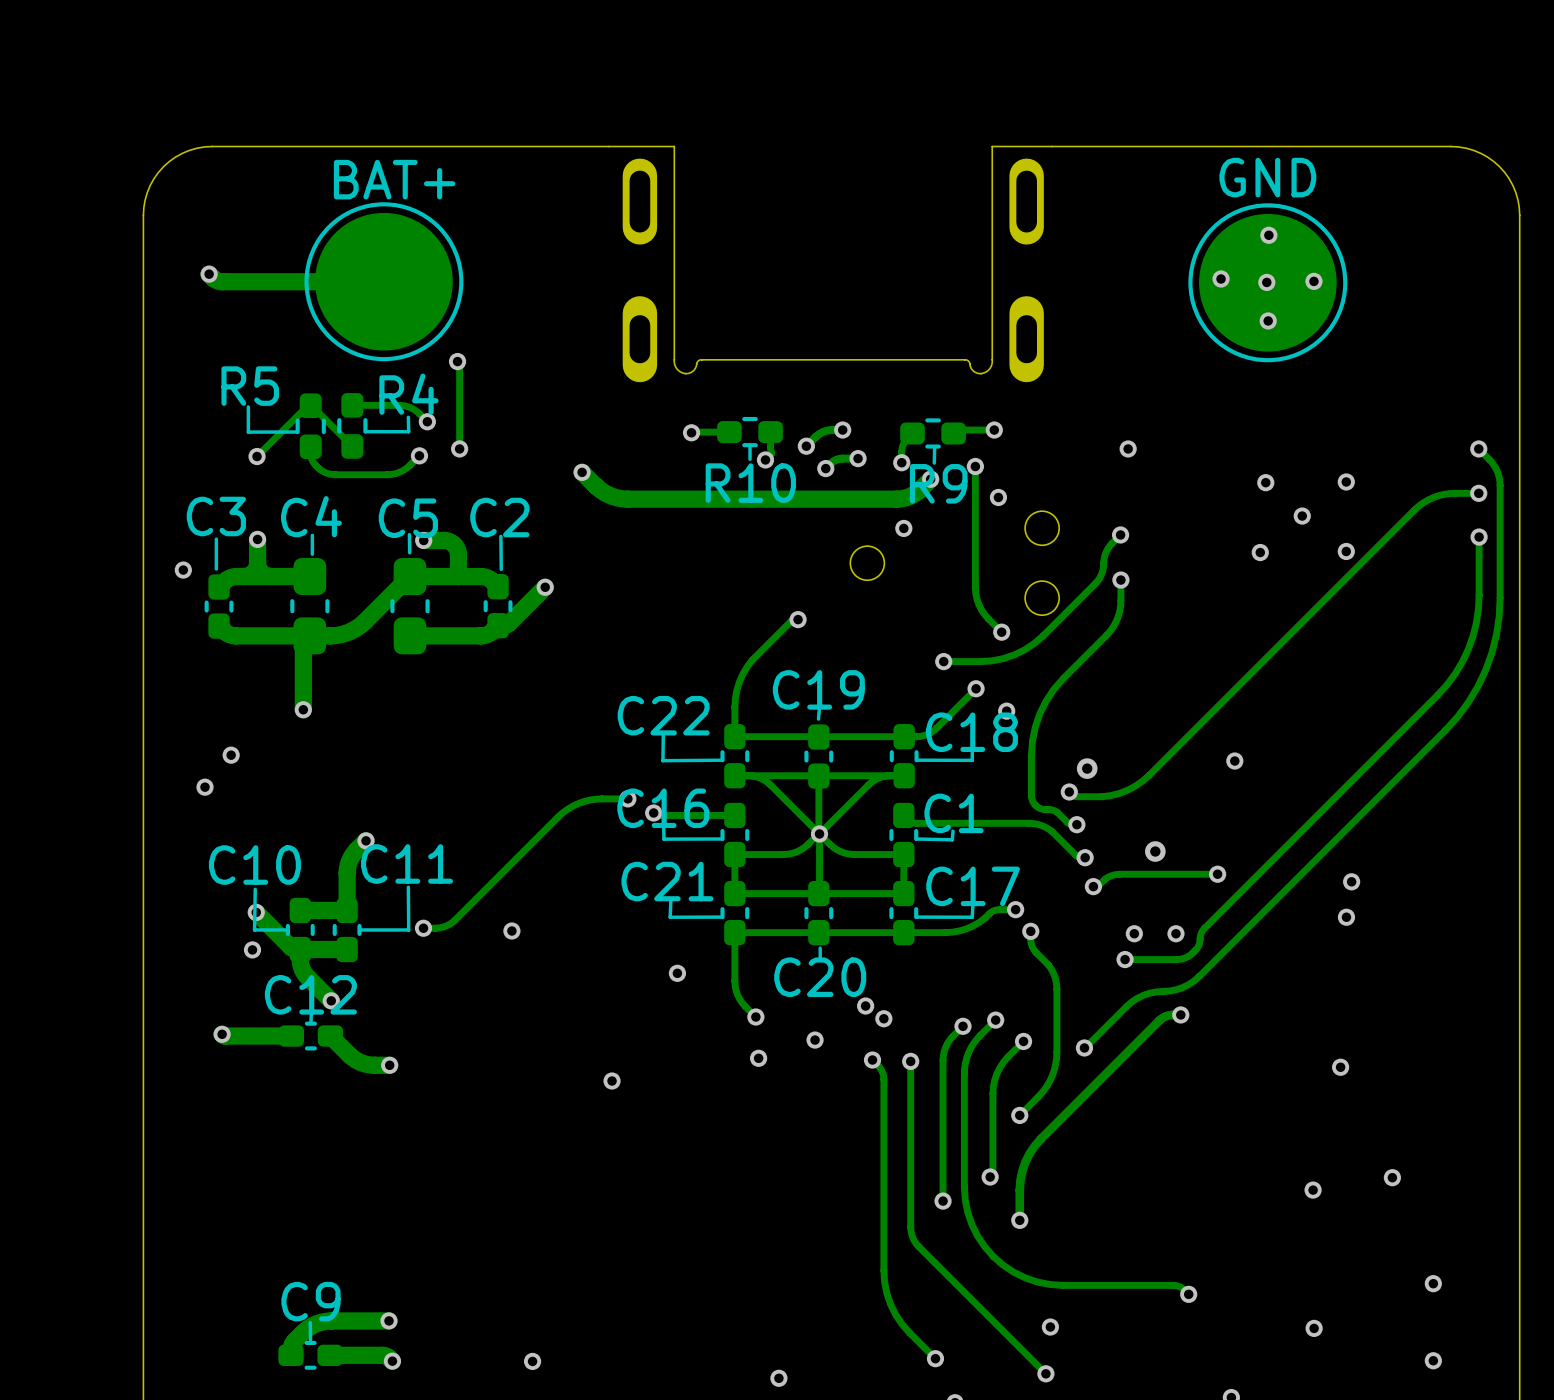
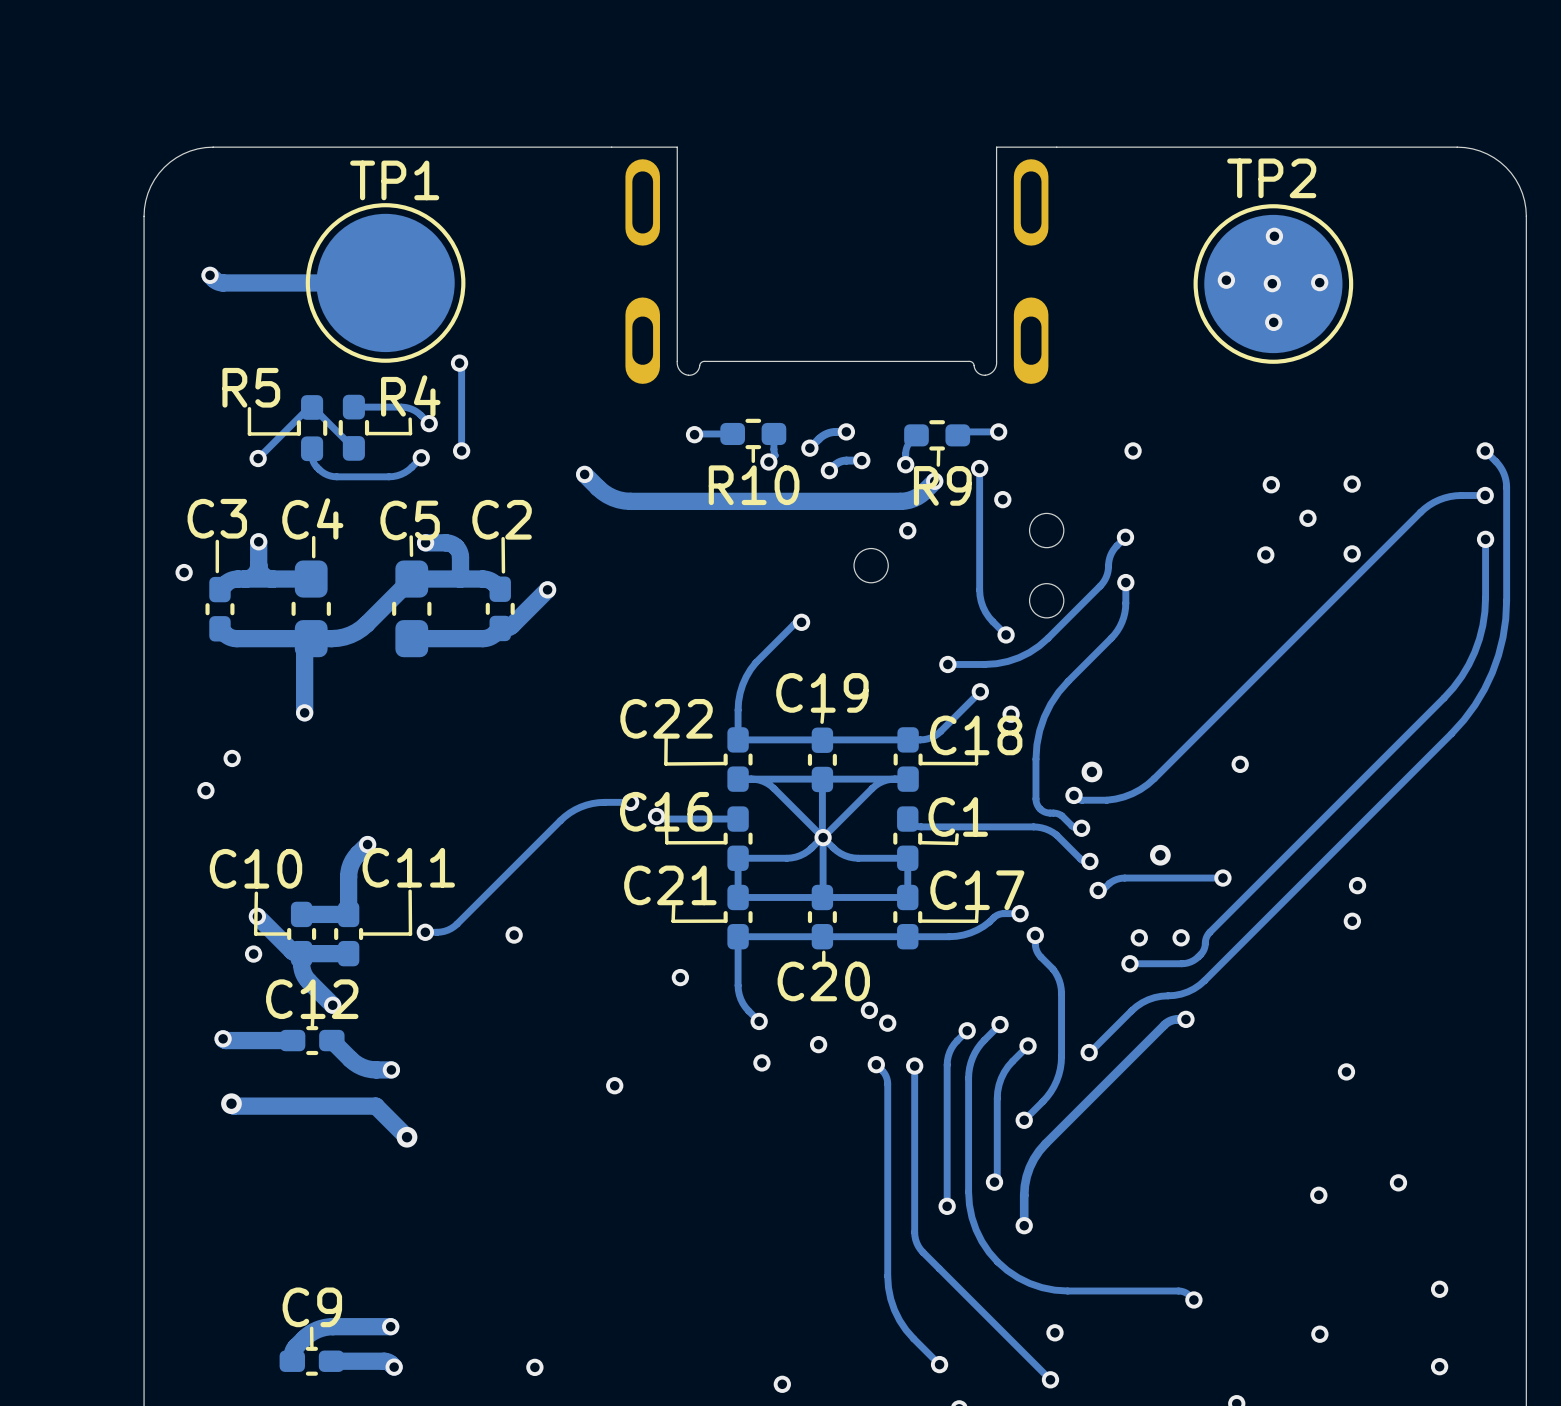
GND name: GND (1267, 177) -> TP2 (1271, 178)
BAT+ name: BAT+ (394, 179) -> TP1 (394, 180)
track: none -> (231, 1103) (233, 1106) (375, 1106) (407, 1137)
via: none -> (231, 1103)
via: none -> (407, 1137)

